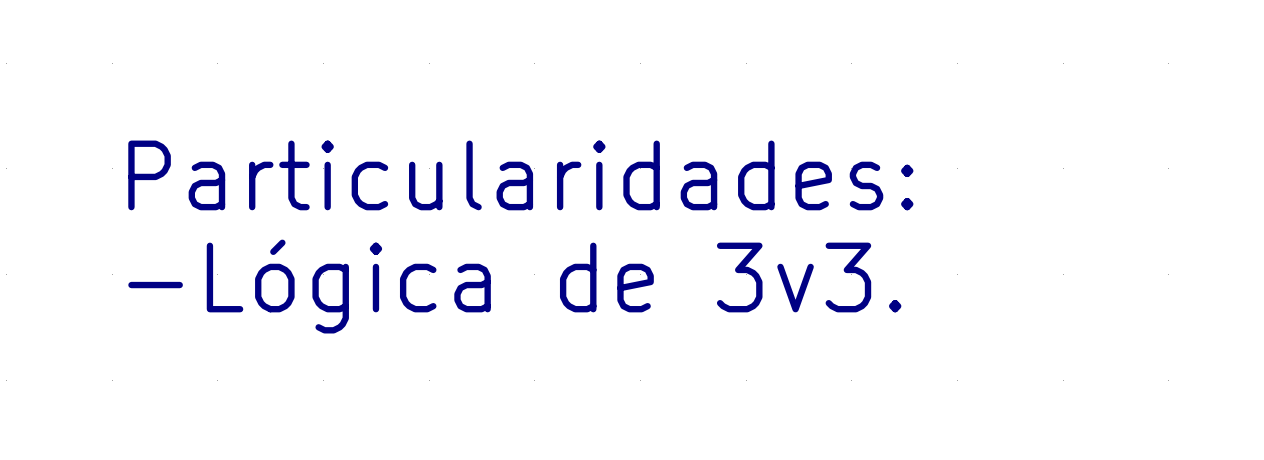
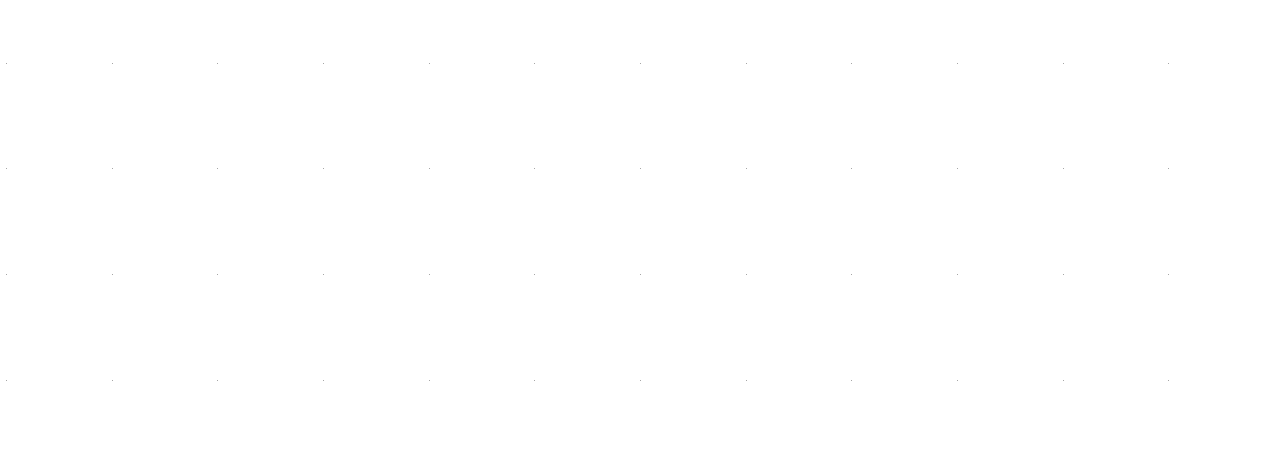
text: Particularidades: (520, 175) -> none
text: -Lógica de 3v3. (514, 286) -> none

